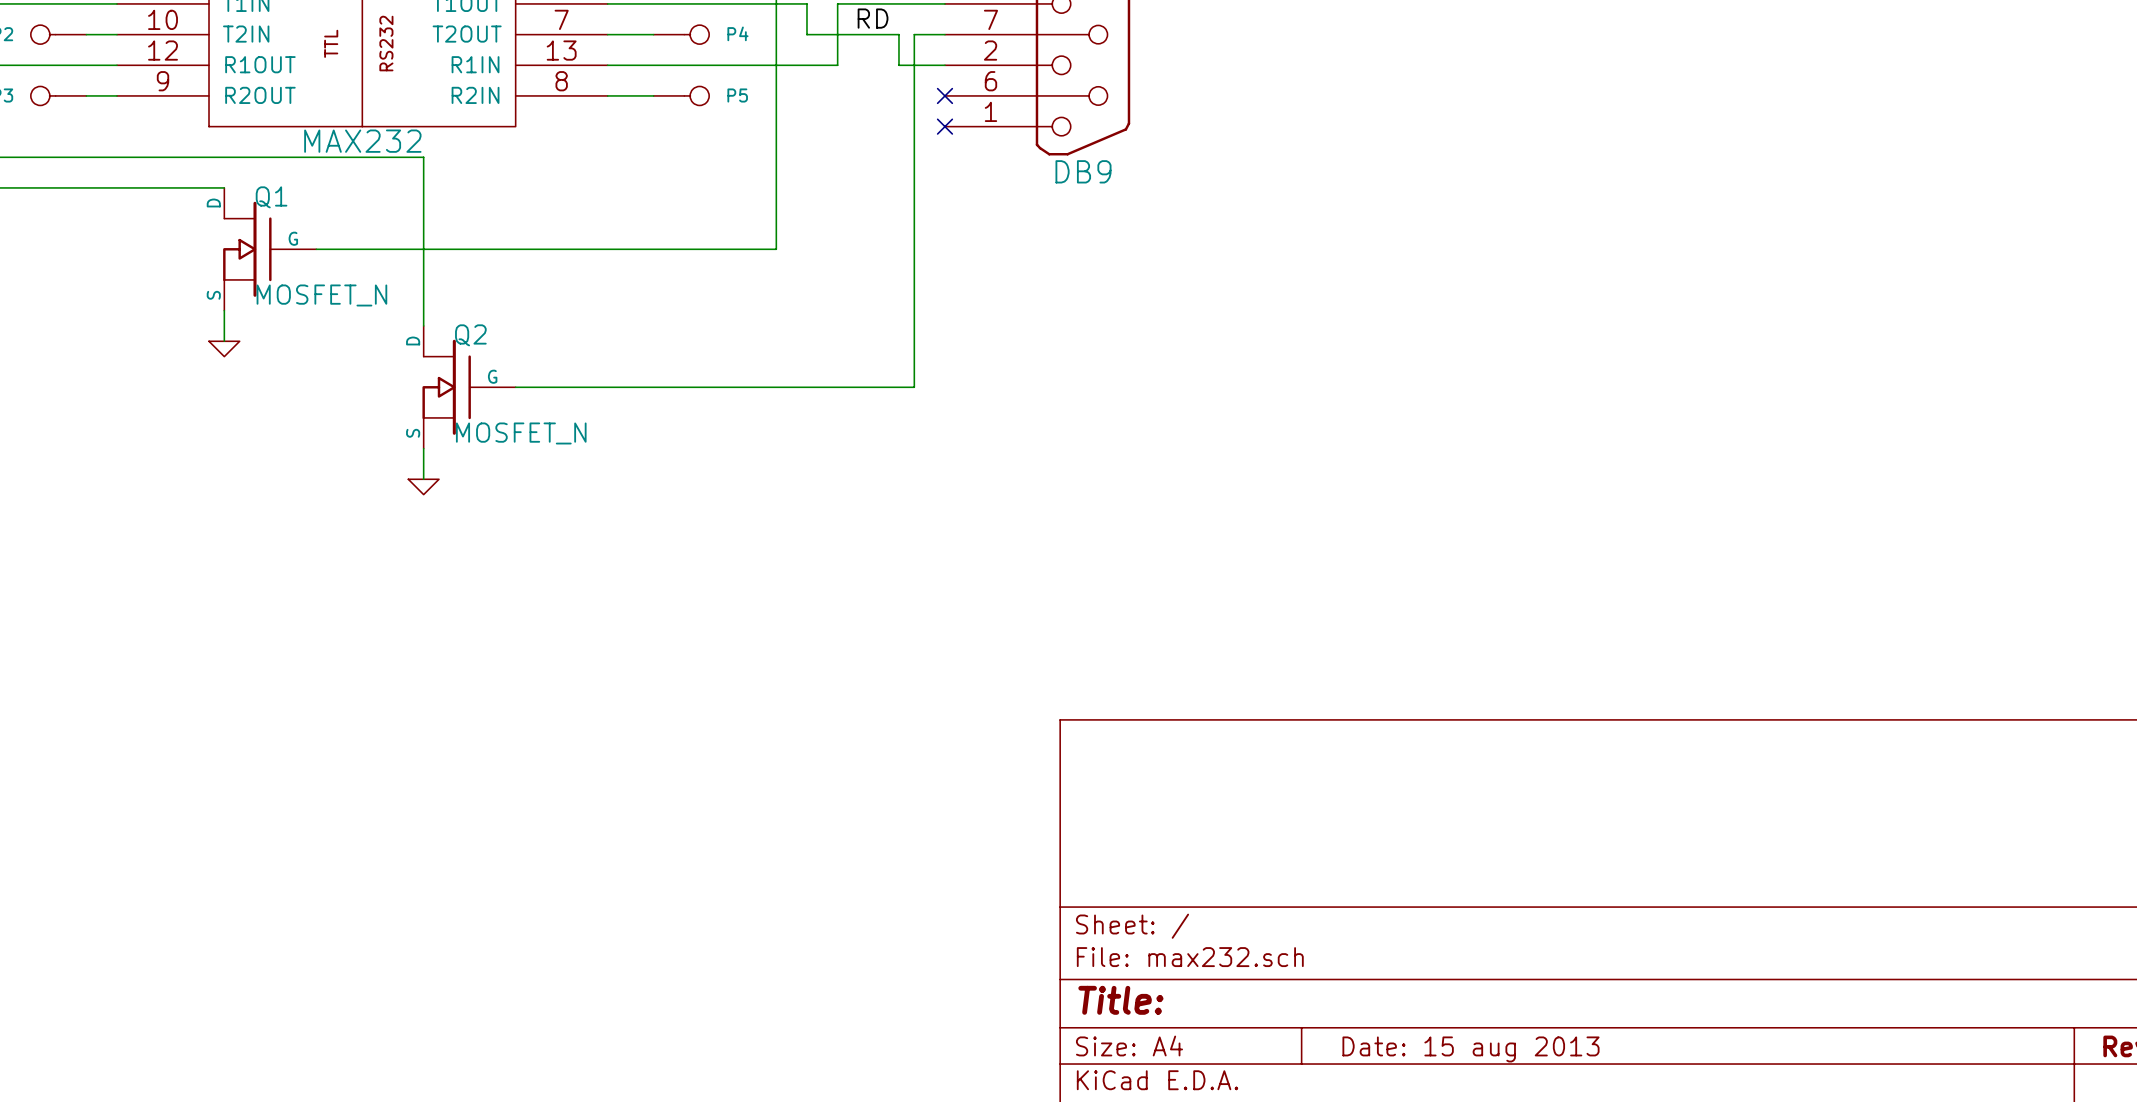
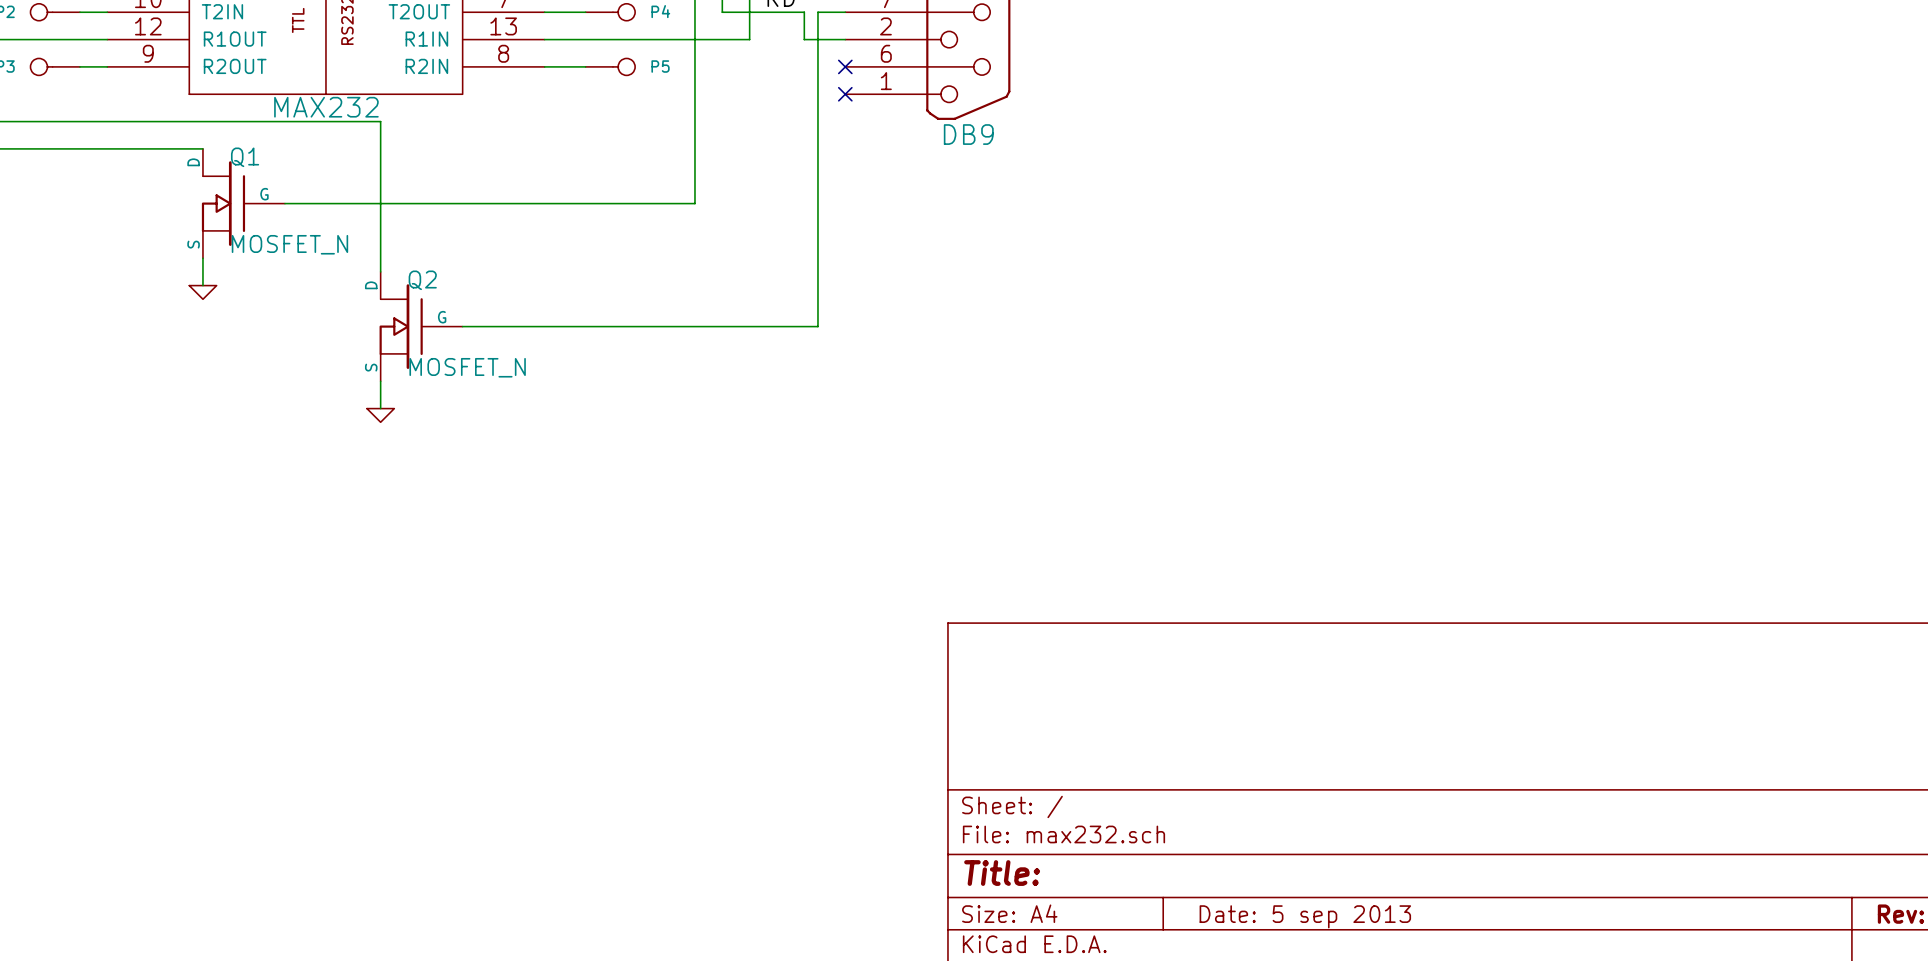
title block: Date: 15 aug 2013 (1471, 1049) -> Date: 5 sep 2013 (1305, 916)

